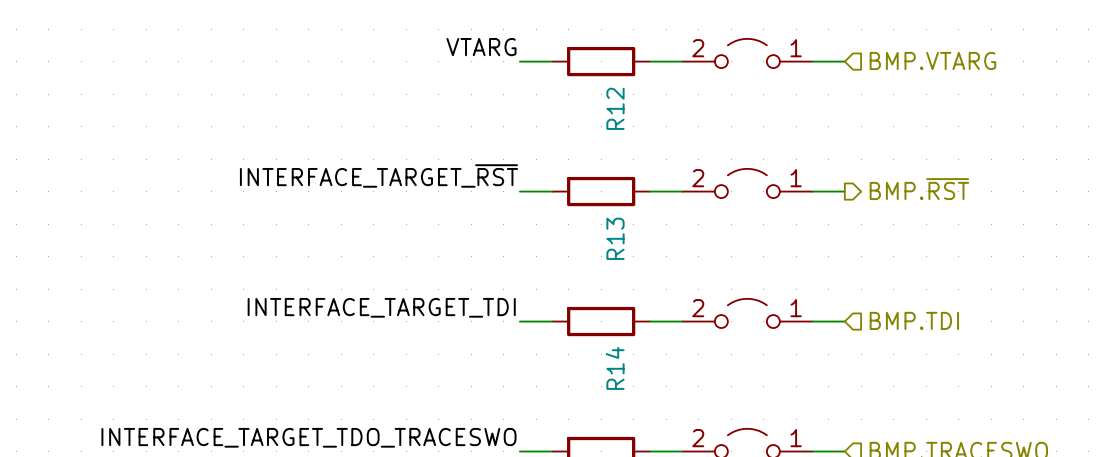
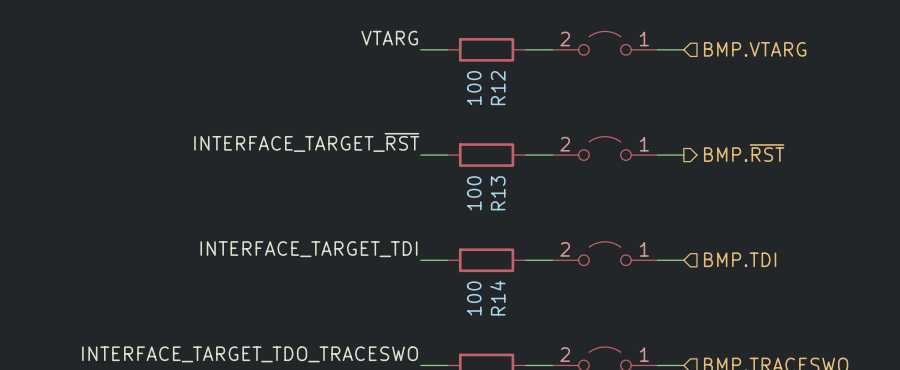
R12 value: none -> 100 (474, 88)
R13 value: none -> 100 (474, 193)
R14 value: none -> 100 (474, 298)

